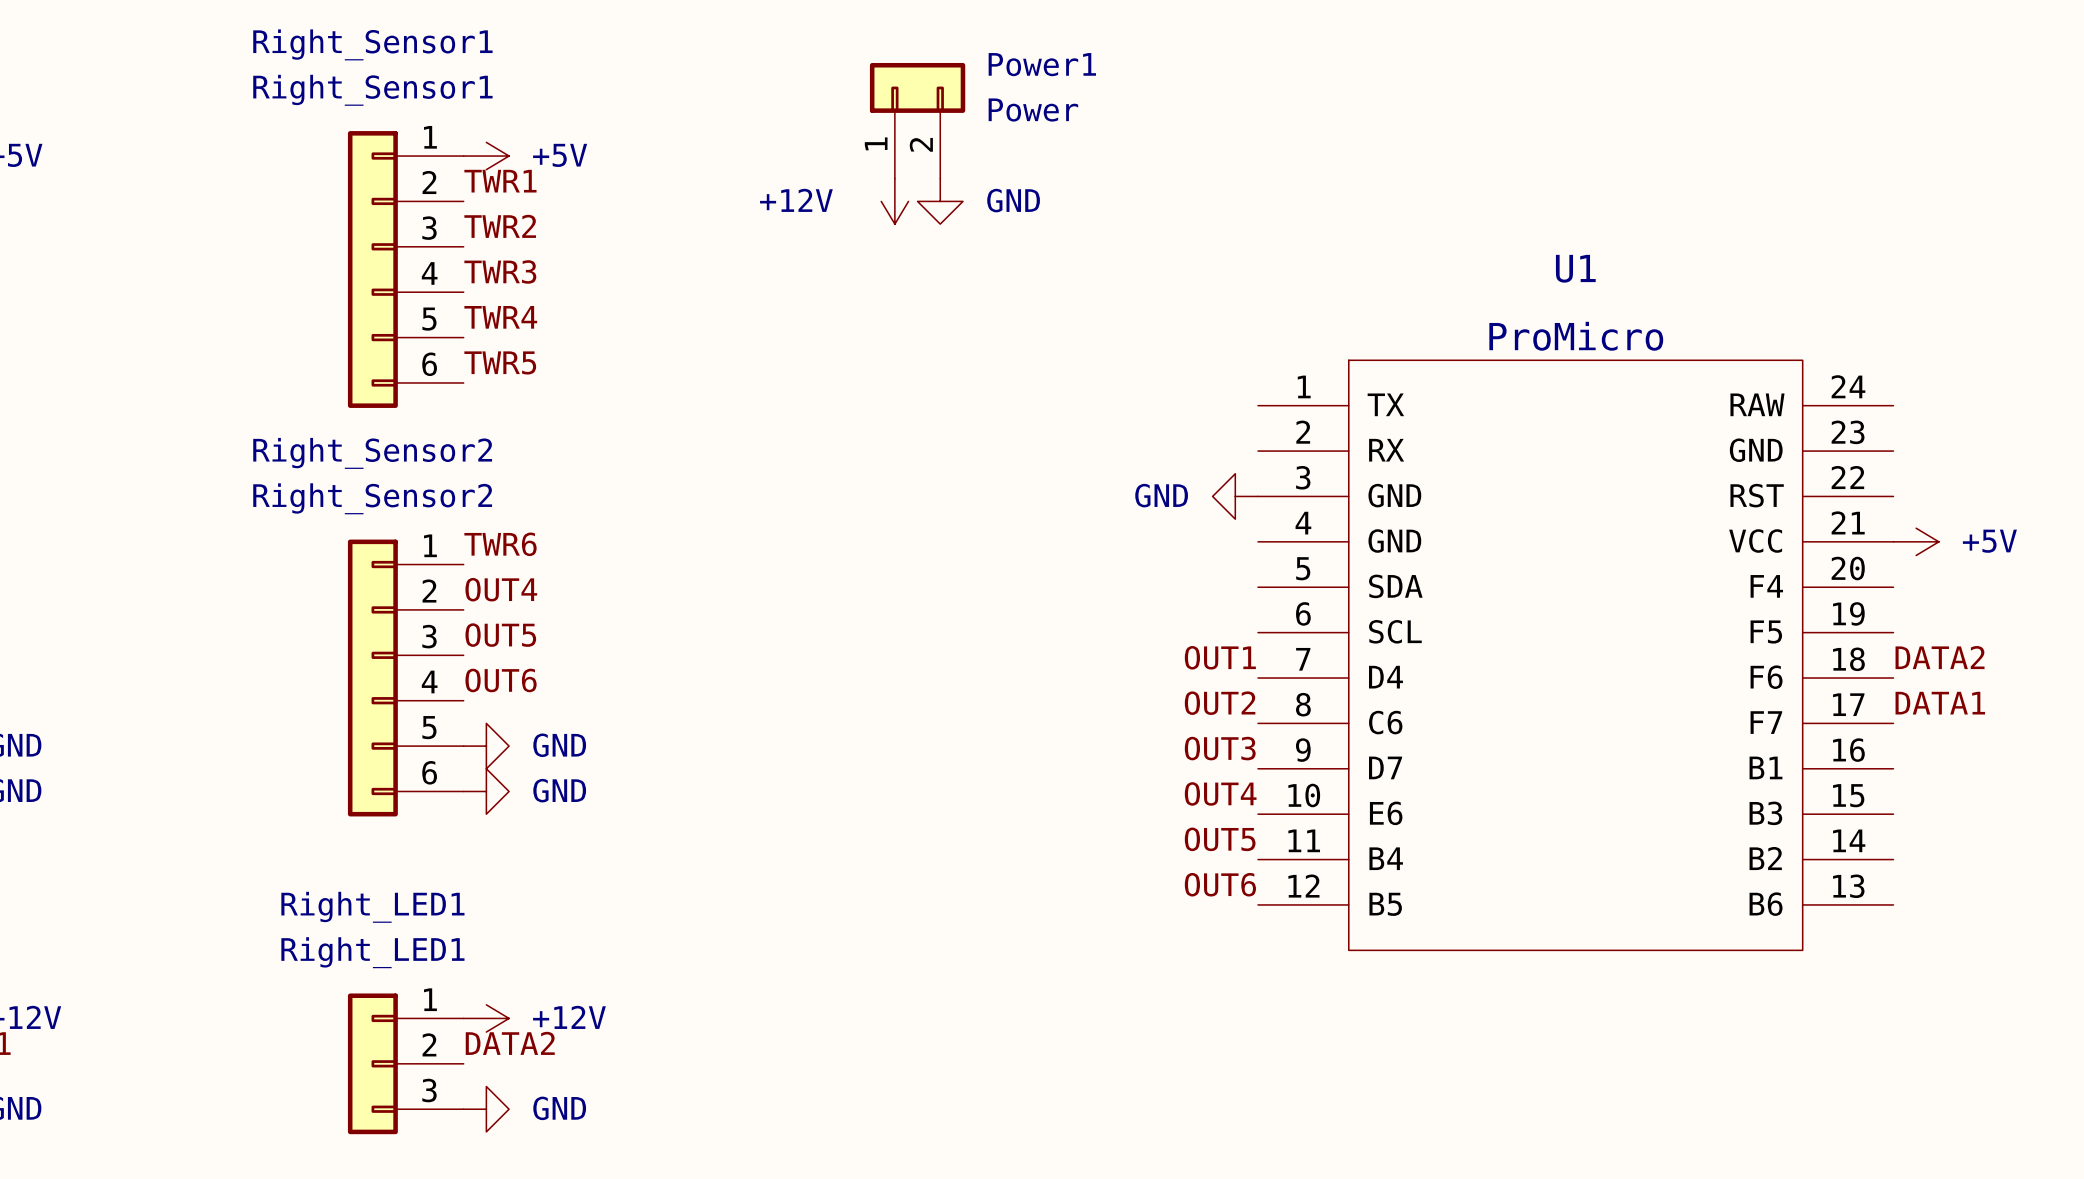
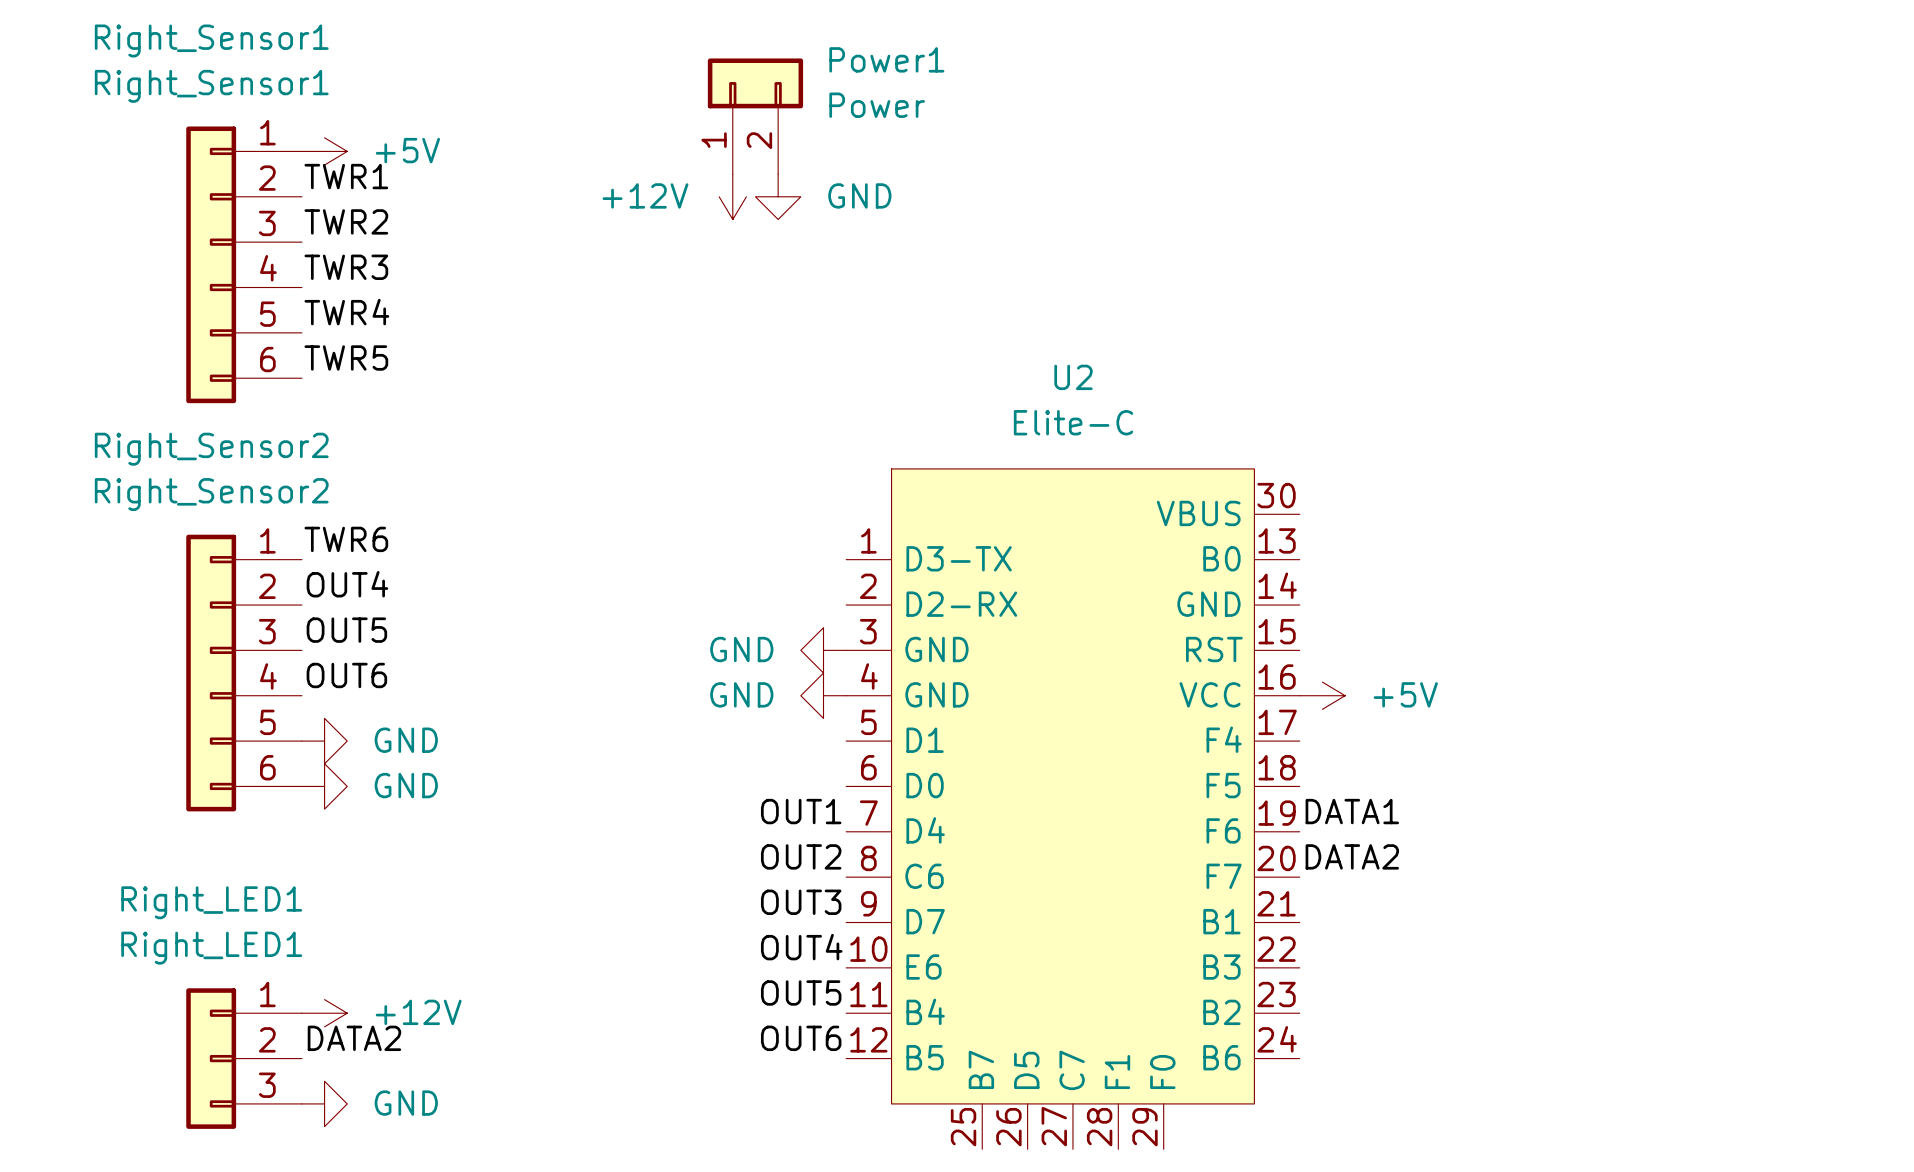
power symbol: GND (1235, 496) -> none
power symbol: +5V (1916, 541) -> none
power symbol: none -> GND (823, 650)
U1: ProMicro (1575, 655) -> none
label position: OUT1 (1220, 657) -> OUT1 (801, 811)
label: DATA2 (1940, 657) -> none
power symbol: none -> GND (823, 695)
power symbol: none -> +5V (1322, 695)
label position: OUT2 (1220, 703) -> OUT2 (801, 856)
label position: DATA1 (1940, 703) -> DATA1 (1352, 811)
label position: OUT3 (1220, 748) -> OUT3 (801, 902)
label position: OUT4 (1220, 793) -> OUT4 (801, 947)
U2: none -> Elite-C (1072, 809)
label position: OUT5 (1220, 839) -> OUT5 (801, 992)
label: none -> DATA2 (1352, 856)
label position: OUT6 (1220, 884) -> OUT6 (801, 1038)

